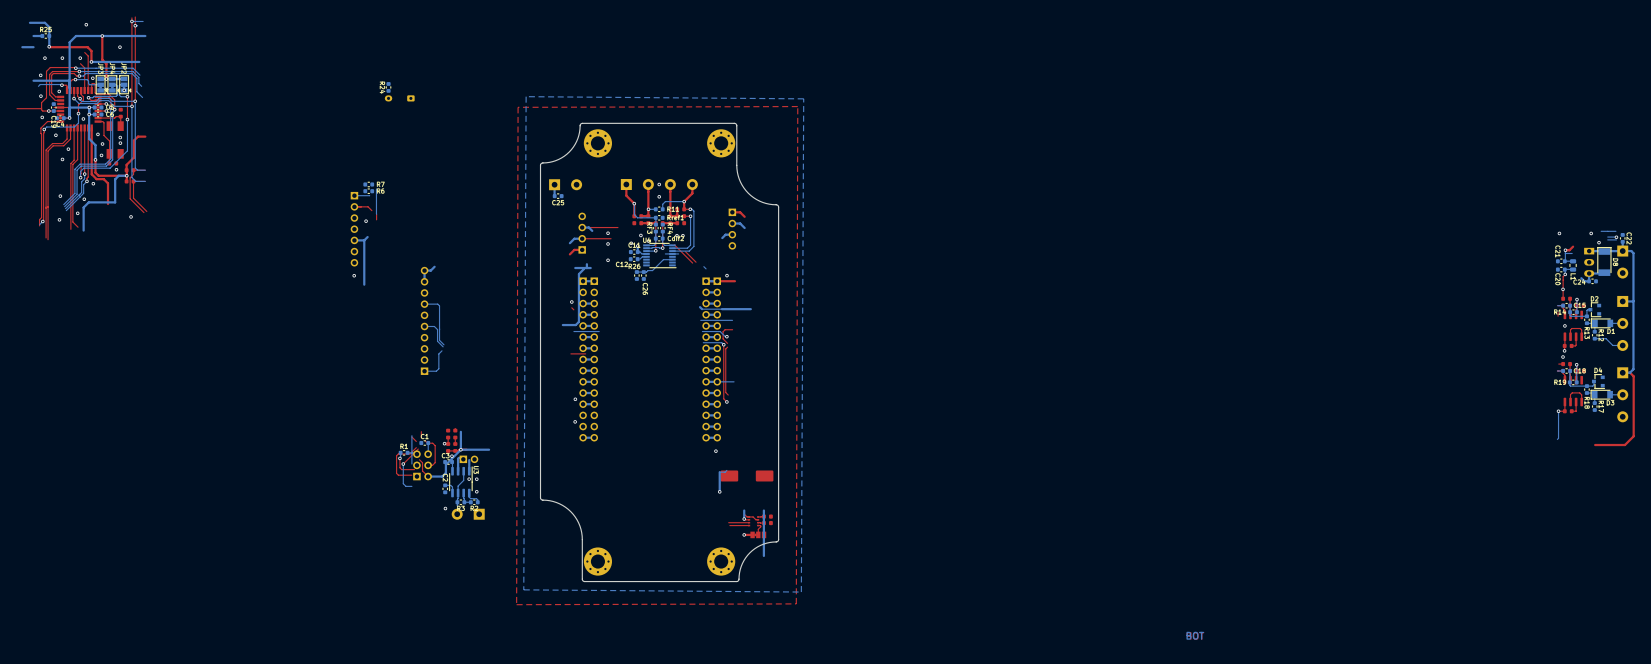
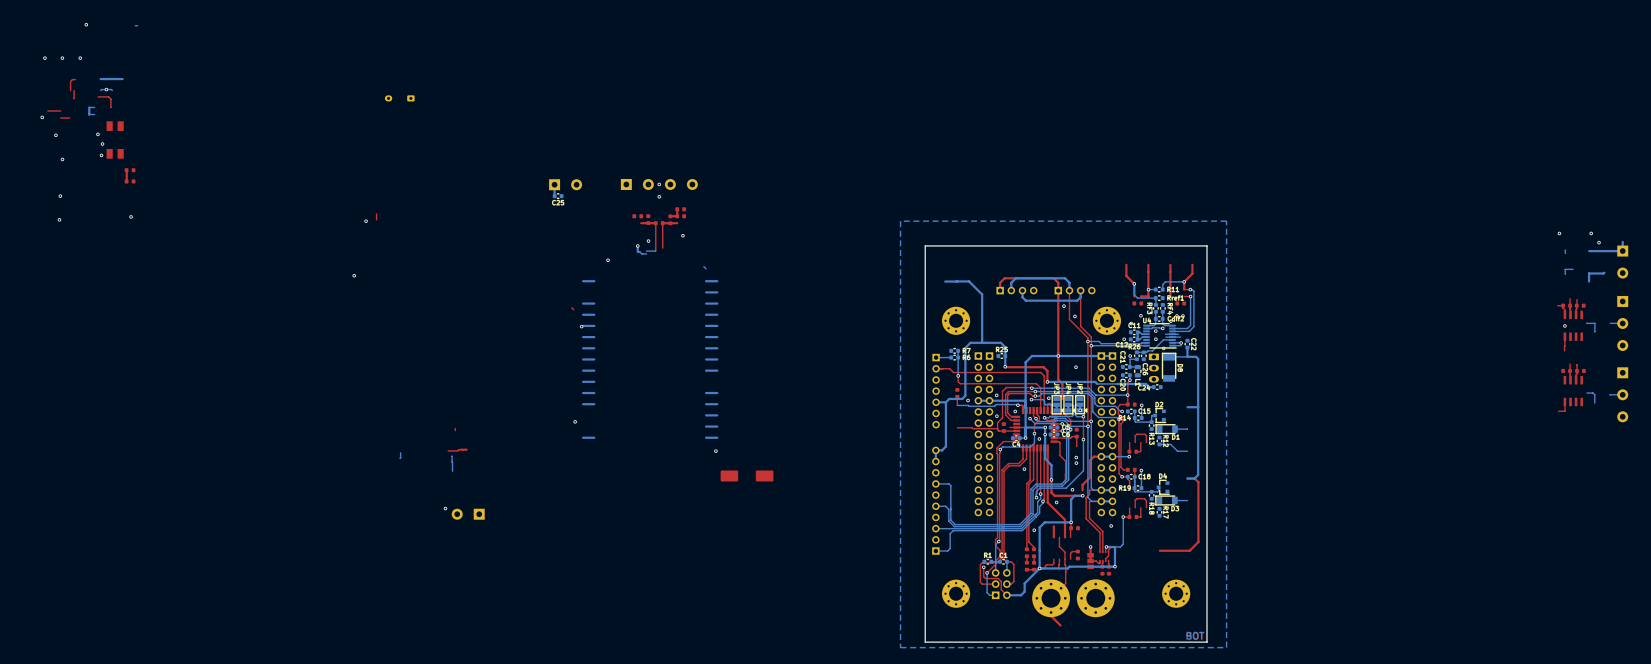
top track: (131, 17) (132, 106) -> none
top track: (135, 17) (135, 101) -> none
via: (131, 21) -> none
bottom track: (143, 21) (131, 21) -> none
bottom track: (29, 22) (44, 22) (49, 27) (49, 46) -> none
via: (135, 25) -> none
bottom track: (42, 36) (33, 36) -> none
part position: (45, 36) -> (1001, 356)
top track: (102, 36) (102, 59) (106, 63) (106, 79) -> none
via: (102, 36) -> none
bottom track: (145, 36) (76, 36) (69, 42) (69, 118) (63, 118) -> none
top track: (49, 46) (87, 47) (91, 50) (91, 61) -> none
via: (49, 46) -> none
bottom track: (33, 47) (22, 47) -> none
via: (119, 47) -> none
top track: (84, 52) (88, 55) (88, 90) -> none
via: (91, 61) -> none
bottom track: (139, 61) (91, 61) -> none
top track: (80, 63) (84, 67) (84, 90) -> none
top track: (75, 68) (50, 67) (46, 71) (46, 97) (41, 102) (41, 109) (47, 111) -> none
bottom track: (75, 68) (133, 68) (139, 75) -> none
via: (75, 68) -> none
top track: (79, 71) (52, 71) (49, 74) (49, 94) (55, 100) (60, 100) -> none
bottom track: (79, 71) (132, 71) (138, 77) (138, 83) (141, 86) -> none
via: (79, 71) -> none
via: (40, 75) -> none
top track: (79, 76) (74, 73) (53, 73) (51, 75) (51, 92) (55, 96) (60, 96) -> none
bottom track: (79, 76) (85, 73) (132, 73) (136, 78) (136, 91) (142, 97) -> none
via: (79, 76) -> none
via: (92, 78) -> none
bottom track: (75, 79) (86, 79) (89, 84) (100, 84) -> none
via: (75, 79) -> none
via: (106, 79) -> none
bottom track: (33, 80) (69, 81) -> none
part position: (101, 84) -> (1057, 404)
bottom track: (111, 84) (117, 86) (116, 96) (88, 97) -> none
part position: (113, 84) -> (1069, 404)
bottom track: (122, 84) (119, 85) (119, 95) (127, 96) -> none
part position: (125, 84) -> (1081, 404)
top track: (61, 85) (67, 86) (67, 90) -> none
bottom track: (61, 85) (40, 84) (38, 86) -> none
via: (61, 85) -> none
part: (388, 87) -> none
top track: (77, 90) (77, 96) (80, 98) -> none
top track: (81, 90) (83, 99) (78, 104) (78, 113) -> none
top track: (91, 90) (91, 84) (94, 83) (96, 94) (108, 94) (114, 99) (114, 109) -> none
via: (124, 90) -> none
via: (59, 91) -> none
via: (40, 96) -> none
top track: (127, 96) (127, 119) -> none
via: (127, 96) -> none
bottom zone outline: (526, 96) (803, 98) (801, 592) (523, 589) (526, 96) -> none
top track: (88, 97) (91, 100) (98, 100) -> none
via: (88, 97) -> none
bottom track: (74, 98) (78, 103) (97, 103) (99, 100) (108, 100) (114, 106) (132, 106) (131, 177) (135, 181) (145, 181) -> none
via: (74, 98) -> none
bottom track: (80, 98) (81, 101) (96, 101) (99, 98) (109, 98) (112, 101) (135, 101) (135, 167) (137, 170) (145, 170) -> none
via: (80, 98) -> none
via: (135, 101) -> none
top track: (106, 103) (98, 103) -> none
via: (106, 103) -> none
via: (132, 106) -> none
top zone outline: (797, 106) (518, 107) (516, 604) (796, 603) (797, 106) -> none
part: (53, 107) -> none
bottom track: (69, 107) (89, 107) (89, 138) (95, 145) (95, 159) -> none
top track: (70, 107) (54, 107) -> none
via: (89, 107) -> none
part position: (98, 107) -> (1054, 427)
bottom track: (110, 107) (110, 159) (105, 164) (80, 164) (74, 169) (74, 193) (63, 204) -> none
via: (110, 107) -> none
top track: (41, 108) (16, 108) -> none
part: (79, 109) -> none
bottom track: (114, 109) (112, 112) (112, 159) (106, 166) (81, 166) (77, 170) (77, 194) (64, 206) -> none
via: (114, 109) -> none
via: (48, 111) -> none
via: (106, 111) -> none
top track: (107, 111) (98, 111) -> none
bottom track: (78, 113) (78, 123) (74, 127) (46, 127) (44, 129) -> none
via: (78, 113) -> none
part: (120, 113) -> none
via: (89, 114) -> none
part position: (98, 114) -> (1054, 434)
part position: (60, 118) -> (1016, 438)
via: (69, 118) -> none
via: (83, 118) -> none
top track: (98, 118) (120, 116) (120, 126) -> none
bottom track: (127, 119) (127, 150) (110, 168) (83, 168) (80, 171) (80, 177) -> none
via: (127, 119) -> none
top track: (60, 121) (47, 121) (40, 128) (41, 217) (39, 225) -> none
top track: (98, 121) (103, 122) (103, 135) (109, 141) (109, 163) -> none
board edge: (734, 123) (581, 123) (576, 141) (569, 152) (558, 159) (540, 164) (540, 498) (562, 505) (577, 519) (582, 536) (582, 579) (584, 581) (737, 581) (742, 563) (749, 552) (760, 545) (778, 540) (778, 206) (756, 199) (742, 185) (736, 168) (736, 125) (734, 123) -> none
top track: (67, 127) (67, 139) (62, 143) (52, 143) (46, 150) (46, 237) -> none
top track: (70, 127) (70, 138) (63, 145) (53, 145) (48, 150) (48, 239) -> none
top track: (74, 127) (74, 160) (70, 163) (70, 229) -> none
top track: (77, 127) (77, 159) (72, 164) (72, 222) (78, 227) -> none
top track: (81, 127) (80, 177) -> none
top track: (84, 127) (84, 174) -> none
top track: (88, 127) (86, 181) -> none
top track: (91, 127) (91, 174) (96, 179) (103, 179) (108, 183) (108, 203) -> none
top track: (44, 129) (43, 220) -> none
via: (44, 129) -> none
top track: (145, 136) (137, 136) (133, 140) (133, 157) (126, 164) (126, 170) -> none
via: (120, 137) -> none
via: (120, 143) -> none
part: (597, 143) -> none
part: (721, 143) -> none
via: (68, 149) -> none
top track: (95, 159) (95, 172) (98, 175) (126, 175) -> none
via: (95, 159) -> none
part: (112, 163) -> none
via: (116, 169) -> none
top track: (145, 170) (133, 170) (133, 174) (130, 177) (130, 198) (143, 212) -> none
bottom track: (84, 174) (84, 178) (81, 181) (81, 192) (65, 208) -> none
via: (84, 174) -> none
bottom track: (126, 175) (118, 175) (115, 179) (115, 202) (88, 202) (83, 207) (83, 230) -> none
via: (126, 175) -> none
via: (80, 177) -> none
bottom track: (86, 181) (83, 184) (83, 193) (66, 210) -> none
via: (86, 181) -> none
top track: (145, 181) (133, 181) (133, 198) (146, 211) -> none
via: (93, 183) -> none
part position: (368, 184) -> (954, 350)
top track: (626, 184) (626, 195) (634, 203) (634, 216) -> none
top track: (648, 184) (648, 216) (641, 216) -> none
top track: (670, 184) (670, 216) -> none
top track: (692, 184) (692, 193) (684, 201) (684, 209) (690, 209) -> none
bottom track: (376, 188) (376, 214) -> none
part position: (368, 191) -> (954, 357)
bottom track: (369, 195) (354, 195) -> none
via: (84, 199) -> none
bottom track: (684, 201) (665, 201) (662, 204) (662, 209) -> none
via: (684, 201) -> none
bottom track: (634, 203) (634, 214) (637, 217) (655, 217) (655, 224) -> none
via: (634, 203) -> none
top track: (354, 206) (368, 206) (371, 210) -> none
via: (648, 209) -> none
bottom track: (655, 209) (648, 209) -> none
part position: (659, 209) -> (1159, 289)
bottom track: (690, 209) (693, 211) (693, 246) (689, 251) (672, 251) -> none
via: (690, 209) -> none
top track: (732, 212) (740, 212) (744, 216) -> none
via: (77, 213) -> none
top track: (690, 216) (684, 216) -> none
bottom track: (690, 216) (690, 245) (687, 248) (672, 248) -> none
via: (690, 216) -> none
part position: (659, 217) -> (1159, 298)
bottom track: (43, 220) (39, 224) -> none
via: (42, 221) -> none
bottom zone outline: none -> (1226, 221) (900, 221) (900, 647) (1226, 647) (1226, 221)
part: (637, 223) -> none
part: (680, 223) -> none
bottom track: (732, 223) (740, 223) (744, 227) -> none
bottom track: (582, 227) (588, 227) (592, 230) -> none
top track: (617, 227) (582, 227) -> none
part position: (655, 228) -> (1155, 308)
part position: (662, 228) -> (1162, 308)
part: (354, 229) -> none
part: (732, 229) -> none
bottom track: (655, 231) (655, 243) (646, 245) -> none
bottom track: (662, 231) (662, 243) (664, 245) (672, 245) -> none
bottom track: (1615, 231) (1601, 231) -> none
part: (582, 233) -> none
via: (608, 233) -> none
bottom track: (732, 234) (725, 234) (722, 238) -> none
via: (640, 235) -> none
via: (676, 235) -> none
bottom track: (367, 237) (364, 240) -> none
bottom track: (1616, 237) (1607, 237) -> none
via: (1616, 237) -> none
bottom track: (582, 238) (574, 238) (569, 243) -> none
top track: (611, 238) (582, 238) -> none
part position: (659, 238) -> (1159, 318)
part position: (1622, 238) -> (1187, 344)
bottom track: (1616, 239) (1607, 239) -> none
bottom track: (364, 240) (354, 240) -> none
bottom track: (364, 240) (364, 284) -> none
via: (608, 243) -> none
via: (631, 243) -> none
top track: (674, 244) (692, 263) -> none
board edge: none -> (1206, 245) (925, 245) (925, 642) (1206, 642) (1206, 245)
top track: (1573, 246) (1569, 250) (1565, 250) -> none
bottom track: (662, 248) (646, 248) -> none
via: (662, 248) -> none
top track: (582, 249) (574, 249) (569, 254) -> none
via: (655, 250) -> none
via: (1565, 250) -> none
top track: (685, 251) (696, 262) -> none
bottom track: (1611, 251) (1631, 251) (1633, 253) (1633, 369) (1629, 372) (1622, 372) -> none
part position: (634, 252) -> (1134, 332)
bottom track: (678, 253) (665, 253) -> none
bottom track: (1572, 253) (1565, 253) (1565, 261) (1572, 261) -> none
part position: (659, 255) -> (1159, 335)
bottom track: (646, 256) (640, 259) -> none
part position: (634, 259) -> (1134, 339)
bottom track: (672, 259) (663, 259) (652, 270) (636, 272) -> none
part position: (1561, 261) -> (1126, 366)
part position: (1604, 261) -> (1169, 367)
part: (1589, 262) -> none
bottom track: (586, 264) (586, 268) -> none
top track: none -> (1126, 264) (1126, 275) (1134, 283) (1134, 296)
top track: none -> (1148, 264) (1148, 296) (1141, 296)
top track: none -> (1170, 264) (1170, 296)
top track: none -> (1192, 264) (1192, 273) (1184, 281) (1184, 289) (1190, 289)
part position: (1573, 265) -> (1137, 371)
bottom track: (434, 266) (430, 270) (424, 270) (424, 281) -> none
bottom track: (584, 268) (578, 274) (578, 321) (575, 325) (562, 325) -> none
bottom track: (590, 268) (575, 268) -> none
part position: (1561, 269) -> (1126, 375)
top track: (1565, 274) (1563, 276) (1563, 298) -> none
via: (1565, 274) -> none
part position: (636, 275) -> (1136, 355)
part position: (643, 275) -> (1143, 355)
via: (727, 275) -> none
bottom track: (1581, 278) (1584, 281) (1589, 281) -> none
top track: (734, 281) (706, 281) -> none
bottom track: none -> (945, 281) (969, 281) (982, 294) (982, 342)
bottom track: none -> (1184, 281) (1165, 281) (1162, 284) (1162, 289)
via: none -> (1184, 281)
part position: (1592, 281) -> (1157, 387)
bottom track: none -> (1134, 283) (1134, 294) (1137, 298) (1155, 298) (1155, 304)
via: none -> (1134, 283)
via: none -> (1148, 289)
bottom track: none -> (1155, 289) (1148, 289)
bottom track: none -> (1190, 289) (1193, 291) (1193, 326) (1189, 331) (1172, 331)
via: none -> (1190, 289)
via: (1563, 289) -> none
top track: none -> (1000, 290) (1000, 282) (1004, 278) (1053, 278) (1058, 282) (1058, 379) (1062, 383) (1062, 399)
part: none -> (1016, 290)
top track: none -> (1069, 290) (1069, 319) (1087, 337) (1088, 426)
bottom track: none -> (1069, 290) (1069, 282) (1065, 278) (1015, 278) (1011, 282) (1011, 290)
part: none -> (1075, 290)
top track: none -> (1080, 290) (1080, 326) (1091, 337) (1091, 421)
bottom track: none -> (1080, 290) (1080, 297) (1077, 300) (1025, 300) (1022, 297) (1022, 290)
top track: none -> (1190, 296) (1184, 296)
bottom track: none -> (1190, 296) (1190, 325) (1187, 328) (1172, 328)
via: none -> (1190, 296)
part: (1566, 298) -> none
bottom track: (1576, 299) (1576, 312) -> none
via: (1576, 299) -> none
bottom track: (1633, 301) (1622, 301) -> none
via: (571, 302) -> none
part: none -> (1137, 303)
part: none -> (1180, 303)
bottom track: (424, 304) (437, 304) (439, 305) (439, 340) (444, 344) -> none
bottom track: (1563, 305) (1557, 305) -> none
part position: (1566, 305) -> (1131, 411)
bottom track: (1570, 305) (1570, 316) (1586, 316) (1586, 310) (1590, 309) -> none
via: none -> (1064, 306)
bottom track: (700, 307) (702, 309) (750, 309) -> none
part position: (1594, 309) -> (1159, 415)
bottom track: none -> (1155, 311) (1155, 323) (1146, 325)
bottom track: none -> (1162, 311) (1162, 323) (1164, 325) (1172, 325)
top track: (1558, 312) (1558, 316) -> none
part position: (1573, 312) -> (1138, 417)
via: none -> (1140, 315)
via: none -> (1176, 315)
via: none -> (1182, 315)
via: none -> (1074, 316)
part position: (1586, 319) -> (1151, 425)
part: (424, 320) -> none
bottom track: (732, 320) (700, 320) -> none
part: none -> (956, 320)
part: none -> (1106, 320)
via: none -> (1170, 321)
via: none -> (1131, 323)
part position: (1602, 323) -> (1166, 429)
bottom track: (424, 326) (434, 326) (437, 329) (437, 341) (443, 346) -> none
bottom track: none -> (1162, 328) (1146, 328)
via: none -> (1162, 328)
top track: (732, 329) (725, 329) (723, 331) (723, 338) (727, 343) -> none
bottom track: (599, 331) (573, 331) -> none
bottom track: (702, 331) (720, 331) (726, 336) -> none
via: none -> (1155, 331)
bottom track: none -> (1146, 334) (1137, 332) (1137, 339) (1146, 337)
bottom track: none -> (1178, 334) (1165, 334)
part position: (1594, 335) -> (1159, 440)
via: (726, 336) -> none
top track: (1576, 336) (1576, 345) (1571, 345) -> none
top track: (1581, 336) (1580, 328) (1571, 328) (1570, 336) -> none
bottom track: none -> (1180, 337) (1165, 337)
bottom track: (1594, 338) (1606, 338) (1612, 345) (1622, 345) -> none
via: none -> (1124, 339)
via: none -> (1155, 339)
bottom track: none -> (1172, 339) (1163, 339) (1152, 350) (1136, 352)
bottom track: none -> (1087, 341) (1099, 341) (1101, 343) (1146, 342)
via: none -> (1087, 341)
bottom track: (703, 342) (721, 342) (723, 344) -> none
bottom track: none -> (1181, 342) (1172, 342)
via: none -> (1181, 343)
top track: (723, 344) (723, 398) (726, 401) -> none
via: (723, 344) -> none
via: none -> (1091, 345)
bottom track: none -> (1146, 345) (1093, 345)
bottom track: none -> (1181, 345) (1172, 345)
part: (1568, 345) -> none
top track: (727, 347) (725, 348) (725, 392) (728, 395) -> none
bottom track: none -> (1187, 347) (1187, 356)
via: none -> (1163, 348)
bottom track: (441, 350) (438, 353) (438, 368) (436, 371) (424, 371) -> none
bottom track: none -> (958, 350) (958, 375)
via: (1564, 350) -> none
top track: (585, 353) (570, 353) -> none
via: none -> (1058, 356)
bottom track: none -> (1112, 356) (1032, 356) (1025, 362) (1025, 438) (1019, 438)
via: none -> (1130, 356)
bottom track: none -> (1187, 356) (1176, 356)
bottom track: none -> (1187, 356) (1196, 356) (1198, 358) (1198, 474) (1194, 478) (1187, 478)
bottom track: none -> (951, 357) (936, 357)
via: (1563, 357) -> none
part: (583, 359) -> none
part: (594, 359) -> none
part: (706, 359) -> none
part: (717, 359) -> none
bottom track: none -> (1136, 359) (1130, 359) (1130, 366) (1137, 366)
top track: (1563, 364) (1558, 364) -> none
part: (1566, 364) -> none
bottom track: (1576, 364) (1576, 382) -> none
via: (1576, 364) -> none
top track: none -> (1005, 366) (1043, 367) (1047, 371) (1047, 381)
bottom track: none -> (1005, 366) (1005, 347) (1000, 342) (970, 342) (965, 347) (965, 395) (962, 398) (949, 398) (945, 402)
via: none -> (1005, 366)
via: none -> (1075, 367)
top track: none -> (936, 368) (949, 368) (953, 372) (1040, 372) (1044, 376) (1044, 410)
part: none -> (1153, 368)
top track: (1557, 371) (1563, 371) (1564, 380) -> none
bottom track: (1563, 371) (1557, 371) -> none
part position: (1566, 371) -> (1131, 476)
bottom track: (1570, 371) (1570, 386) (1592, 386) (1593, 381) -> none
top track: (1622, 372) (1630, 372) (1633, 376) (1633, 436) (1624, 445) (1595, 445) -> none
top track: none -> (958, 375) (960, 383) (1036, 383) (1040, 387) (1040, 410)
via: none -> (958, 375)
bottom track: none -> (1129, 375) (1129, 380)
top track: none -> (1129, 380) (1127, 382) (1127, 404) (1120, 404) (1118, 406) (1118, 413) (1122, 418) (1120, 423) (1120, 467) (1127, 469)
via: none -> (1129, 380)
bottom track: (734, 381) (706, 381) -> none
bottom track: none -> (1047, 381) (1146, 383) (1149, 387) (1153, 387)
via: none -> (1047, 381)
part position: (1598, 381) -> (1163, 487)
part position: (1573, 382) -> (1138, 488)
top track: none -> (1031, 388) (1006, 387) (1002, 391) (1002, 417) (997, 422) (997, 429) (1003, 431)
bottom track: none -> (1031, 388) (1089, 388) (1095, 395) (1127, 395)
via: none -> (1031, 388)
part position: (1586, 389) -> (1151, 495)
part: none -> (936, 391)
top track: none -> (1035, 391) (1008, 391) (1005, 394) (1005, 414) (1011, 420) (1016, 420)
bottom track: none -> (1035, 391) (1088, 391) (1094, 397) (1094, 403) (1097, 406) (1115, 406) (1122, 411)
via: none -> (1035, 391)
part: none -> (957, 393)
part position: (1601, 394) -> (1166, 500)
via: none -> (996, 395)
via: none -> (1127, 395)
top track: none -> (957, 396) (957, 405)
top track: none -> (1035, 396) (1030, 393) (1009, 393) (1007, 395) (1007, 412) (1011, 416) (1016, 416)
bottom track: none -> (1035, 396) (1041, 393) (1088, 393) (1092, 398) (1092, 411) (1098, 417) (1117, 417) (1119, 419)
via: none -> (1035, 396)
via: none -> (1048, 398)
via: (575, 399) -> none
bottom track: none -> (1031, 399) (1042, 399) (1045, 404) (1056, 404)
via: none -> (1031, 399)
via: none -> (968, 400)
bottom track: none -> (978, 400) (1025, 401)
via: (726, 401) -> none
bottom track: none -> (945, 402) (936, 402)
bottom track: none -> (945, 402) (945, 446) (942, 450) (935, 450) (935, 461)
top track: (1576, 402) (1576, 411) (1571, 411) -> none
top track: (1581, 402) (1579, 392) (1572, 392) (1570, 402) -> none
bottom track: none -> (1067, 404) (1073, 406) (1072, 416) (1044, 417)
bottom track: none -> (1078, 404) (1075, 405) (1075, 415) (1083, 416)
part: none -> (1131, 404)
top track: none -> (1017, 405) (1023, 406) (1023, 410)
bottom track: none -> (1017, 405) (957, 405)
via: none -> (1017, 405)
bottom track: none -> (1141, 405) (1141, 417)
via: none -> (1141, 405)
part position: (1594, 406) -> (1159, 512)
bottom track: none -> (1198, 407) (1187, 407)
top track: none -> (1033, 410) (1033, 416) (1036, 418)
top track: none -> (1037, 410) (1039, 419) (1034, 424) (1034, 433)
top track: none -> (1047, 410) (1047, 404) (1050, 403) (1052, 414) (1064, 414) (1070, 419) (1070, 429)
via: none -> (1080, 410)
via: none -> (1015, 411)
via: none -> (1122, 411)
bottom track: none -> (1134, 411) (1135, 422) (1151, 422) (1151, 416) (1155, 415)
bottom track: (1558, 411) (1557, 439) -> none
via: (1558, 411) -> none
part: (1568, 411) -> none
via: none -> (996, 416)
top track: none -> (1083, 416) (1083, 439)
via: none -> (1083, 416)
top track: none -> (1044, 417) (1047, 420) (1054, 420)
via: none -> (1044, 417)
bottom track: none -> (1030, 418) (1034, 423) (1053, 423) (1055, 420) (1064, 420) (1070, 426) (1088, 426) (1087, 497) (1091, 501) (1112, 501)
via: none -> (1030, 418)
bottom track: none -> (1036, 418) (1037, 421) (1052, 421) (1055, 418) (1065, 418) (1068, 421) (1091, 421) (1091, 487) (1093, 490) (1112, 490)
via: none -> (1036, 418)
top track: none -> (1119, 419) (1119, 473) (1122, 476) (1127, 476) (1129, 486)
via: none -> (1119, 419)
via: none -> (1091, 421)
top track: none -> (1062, 423) (1054, 423)
via: none -> (1062, 423)
via: none -> (1088, 426)
top track: none -> (957, 427) (997, 428)
part: none -> (1003, 427)
bottom track: none -> (1025, 427) (1045, 427) (1045, 458) (1051, 465) (1051, 479)
top track: none -> (1026, 427) (1010, 427)
via: none -> (1045, 427)
bottom track: none -> (1066, 427) (1066, 479) (1061, 484) (1036, 484) (1030, 489) (1030, 513) (1019, 524) (955, 524) (950, 520) (950, 485) (949, 483) (935, 483)
via: none -> (1066, 427)
part: none -> (1035, 429)
bottom track: none -> (1070, 429) (1068, 432) (1068, 479) (1062, 486) (1037, 486) (1033, 490) (1033, 514) (1020, 526) (954, 526) (948, 521) (948, 509) (945, 506) (935, 506)
via: none -> (1070, 429)
bottom track: none -> (1175, 429) (1187, 429)
top track: (421, 431) (421, 437) -> none
bottom track: (460, 431) (460, 449) -> none
top track: none -> (1016, 431) (1003, 431)
via: none -> (1062, 431)
top track: none -> (1063, 431) (1054, 431)
bottom track: none -> (1034, 433) (1034, 443) (1030, 447) (1002, 447) (1000, 449)
via: none -> (1034, 433)
part: none -> (1076, 433)
part: (448, 434) -> none
part: (455, 434) -> none
part: none -> (978, 434)
part: none -> (989, 434)
via: none -> (1045, 434)
part: none -> (1101, 434)
part: none -> (1112, 434)
bottom track: (411, 435) (411, 464) -> none
top track: (411, 436) (416, 441) -> none
top track: (448, 437) (448, 444) -> none
top track: (455, 437) (455, 444) -> none
via: none -> (1025, 438)
via: none -> (1039, 438)
top track: none -> (1054, 438) (1076, 436) (1076, 446)
bottom track: none -> (1083, 439) (1083, 470) (1066, 488) (1039, 488) (1036, 491) (1036, 497)
via: none -> (1083, 439)
top track: (425, 440) (435, 445) (435, 462) (432, 465) (428, 465) -> none
top track: none -> (1016, 441) (1003, 441) (996, 448) (997, 537) (995, 545) (1000, 550) (1000, 556) (993, 562) (982, 562) (980, 564) (980, 582) (982, 584) (995, 584)
top track: none -> (1054, 441) (1059, 442) (1059, 455) (1065, 461) (1065, 483)
top track: none -> (1129, 442) (1129, 451)
top track: none -> (1140, 442) (1140, 450) (1136, 451)
top track: none -> (1146, 442) (1144, 434) (1136, 434) (1135, 442)
part position: (424, 443) -> (1003, 561)
bottom track: (428, 443) (428, 454) -> none
via: (444, 443) -> none
bottom track: none -> (1159, 444) (1170, 444) (1177, 451) (1187, 451)
top track: (416, 447) (410, 453) (398, 453) (396, 455) (396, 473) (398, 475) (411, 475) -> none
part: (448, 447) -> none
part: (455, 447) -> none
top track: none -> (1023, 447) (1023, 459) (1018, 463) (1008, 463) (1002, 470) (1002, 557) (987, 572)
top track: none -> (1026, 447) (1026, 458) (1019, 465) (1009, 465) (1004, 470) (1004, 559) (1013, 564) (1013, 581) (1011, 584) (1006, 584)
top track: none -> (1030, 447) (1030, 480) (1026, 483) (1026, 549)
top track: none -> (1033, 447) (1033, 479) (1028, 484) (1028, 542) (1034, 549)
top track: none -> (1037, 447) (1036, 497)
top track: none -> (1040, 447) (1040, 494)
top track: none -> (1044, 447) (1042, 501)
top track: none -> (1047, 447) (1047, 502) (1065, 519) (1065, 537)
top track: (418, 449) (403, 464) -> none
bottom track: (460, 449) (445, 464) (445, 472) (442, 476) (428, 476) -> none
via: (460, 449) -> none
bottom track: (489, 449) (460, 449) -> none
top track: none -> (1000, 449) (999, 540)
via: none -> (1000, 449)
part: none -> (1132, 451)
part position: (404, 452) -> (987, 561)
bottom track: (416, 452) (407, 452) -> none
via: (451, 456) -> none
top track: none -> (1101, 456) (1093, 456) (1089, 460) (1089, 477) (1082, 484) (1082, 490)
bottom track: none -> (1129, 456) (1101, 456)
via: none -> (1129, 456)
bottom track: (459, 457) (458, 471) -> none
via: none -> (1076, 457)
top track: (399, 458) (401, 469) (414, 469) -> none
via: (399, 458) -> none
top track: (419, 459) (422, 462) (422, 470) (428, 476) -> none
part: (468, 459) -> none
bottom track: (469, 460) (469, 471) -> none
part: (448, 462) -> none
via: none -> (1076, 463)
bottom track: (403, 464) (403, 483) (405, 486) (411, 486) -> none
via: (403, 464) -> none
part: (422, 465) -> none
via: none -> (1024, 469)
part: none -> (1131, 469)
top track: none -> (1134, 469) (1135, 486)
bottom track: (726, 470) (719, 472) (719, 491) -> none
bottom track: none -> (1141, 470) (1141, 488)
via: none -> (1141, 470)
bottom track: (463, 471) (463, 480) (458, 486) (457, 506) -> none
via: none -> (1122, 476)
bottom track: none -> (1134, 476) (1135, 491) (1157, 491) (1158, 487)
top track: none -> (1187, 478) (1194, 478) (1198, 482) (1198, 542) (1189, 550) (1159, 550)
via: (469, 479) -> none
via: (476, 479) -> none
top track: none -> (1051, 479) (1051, 492) (1054, 495) (1082, 495)
via: none -> (1051, 479)
part: (460, 482) -> none
bottom track: (445, 485) (452, 487) (452, 493) -> none
part: (445, 488) -> none
via: none -> (1072, 489)
top track: none -> (1101, 490) (1089, 490) (1089, 494) (1086, 497) (1086, 518) (1099, 532) (1099, 551)
via: (476, 491) -> none
via: (719, 491) -> none
bottom track: (463, 493) (464, 502) (470, 502) -> none
bottom track: (469, 493) (469, 497) (476, 498) (477, 502) -> none
bottom track: none -> (1040, 494) (1040, 498) (1037, 501) (1037, 512) (1021, 528) (935, 528)
via: none -> (1040, 494)
bottom track: none -> (1082, 495) (1074, 495) (1071, 499) (1071, 522) (1044, 522) (1039, 527) (1039, 568)
via: none -> (1082, 495)
via: none -> (1036, 497)
part: none -> (935, 500)
bottom track: none -> (1174, 500) (1187, 500)
bottom track: none -> (1042, 501) (1039, 506) (1039, 513) (1022, 530) (953, 530) (950, 533) (950, 548) (947, 551) (935, 551)
via: none -> (1042, 501)
top track: none -> (1101, 501) (1089, 501) (1089, 518) (1102, 531) (1102, 551)
part: (460, 502) -> none
part: (474, 502) -> none
via: none -> (1056, 502)
top track: none -> (1129, 507) (1129, 516) (1123, 517)
top track: none -> (1140, 507) (1140, 516) (1136, 517)
top track: none -> (1146, 507) (1144, 498) (1136, 498) (1135, 507)
bottom track: (744, 510) (744, 519) -> none
bottom track: (763, 510) (763, 555) -> none
top track: (744, 514) (758, 519) -> none
top track: (764, 516) (758, 516) -> none
part: (767, 516) -> none
bottom track: none -> (1123, 517) (1123, 544) (1120, 546) (1114, 546)
via: none -> (1123, 517)
part: none -> (1132, 517)
top track: (744, 519) (749, 519) -> none
via: (744, 519) -> none
part: (753, 521) -> none
top track: (749, 522) (728, 522) -> none
top track: (758, 522) (764, 523) -> none
top track: none -> (1071, 522) (1070, 537)
via: none -> (1071, 522)
part: (767, 523) -> none
top track: (749, 525) (729, 525) -> none
top track: (758, 525) (760, 525) (758, 534) -> none
via: none -> (1111, 525)
top track: none -> (1053, 526) (1053, 537)
part: none -> (1074, 528)
via: none -> (1034, 530)
via: (744, 534) -> none
top track: (752, 534) (744, 534) -> none
part: (758, 534) -> none
top track: none -> (1059, 537) (1059, 546) (1065, 552) (1065, 583) (1051, 598) (1051, 616) (1060, 625)
bottom track: none -> (999, 540) (995, 544) (995, 572)
via: none -> (998, 541)
top track: none -> (1090, 546) (1090, 555)
via: none -> (1090, 546)
top track: none -> (1106, 546) (1105, 551)
via: none -> (1106, 546)
bottom track: none -> (1114, 546) (1106, 546)
bottom track: none -> (1114, 546) (1114, 566) (1039, 568)
top track: none -> (1110, 547) (1105, 560)
top track: none -> (1077, 551) (1070, 553) (1070, 559)
part: none -> (1026, 552)
part: none -> (1034, 552)
part: none -> (1077, 555)
top track: none -> (1026, 556) (1026, 562)
top track: none -> (1034, 556) (1034, 562)
part: none -> (1104, 556)
top track: none -> (1053, 559) (1053, 563) (1046, 564) (1045, 568) (1026, 569)
top track: none -> (1059, 559) (1058, 568) (1052, 568)
top track: none -> (1099, 560) (1099, 563) (1090, 561)
top track: none -> (1102, 560) (1102, 566)
top track: none -> (1108, 560) (1108, 566)
part: (597, 561) -> none
part: (721, 561) -> none
bottom track: none -> (1000, 561) (991, 561)
bottom track: none -> (1006, 561) (1006, 572)
part: none -> (1090, 561)
part: none -> (1026, 566)
part: none -> (1034, 566)
via: none -> (1114, 566)
top track: none -> (983, 567) (983, 576) (985, 578) (998, 578) (1001, 581) (1001, 589) (1006, 595)
via: none -> (983, 567)
bottom track: none -> (1039, 568) (1024, 583) (1024, 591) (1021, 595) (1006, 595)
via: none -> (1039, 568)
part: none -> (1102, 570)
part: none -> (1108, 570)
bottom track: none -> (987, 572) (987, 592) (989, 595) (995, 595)
via: none -> (987, 572)
part: none -> (1001, 584)
part: none -> (956, 593)
part: none -> (1176, 593)
part: none -> (1051, 598)
part: none -> (1095, 598)

